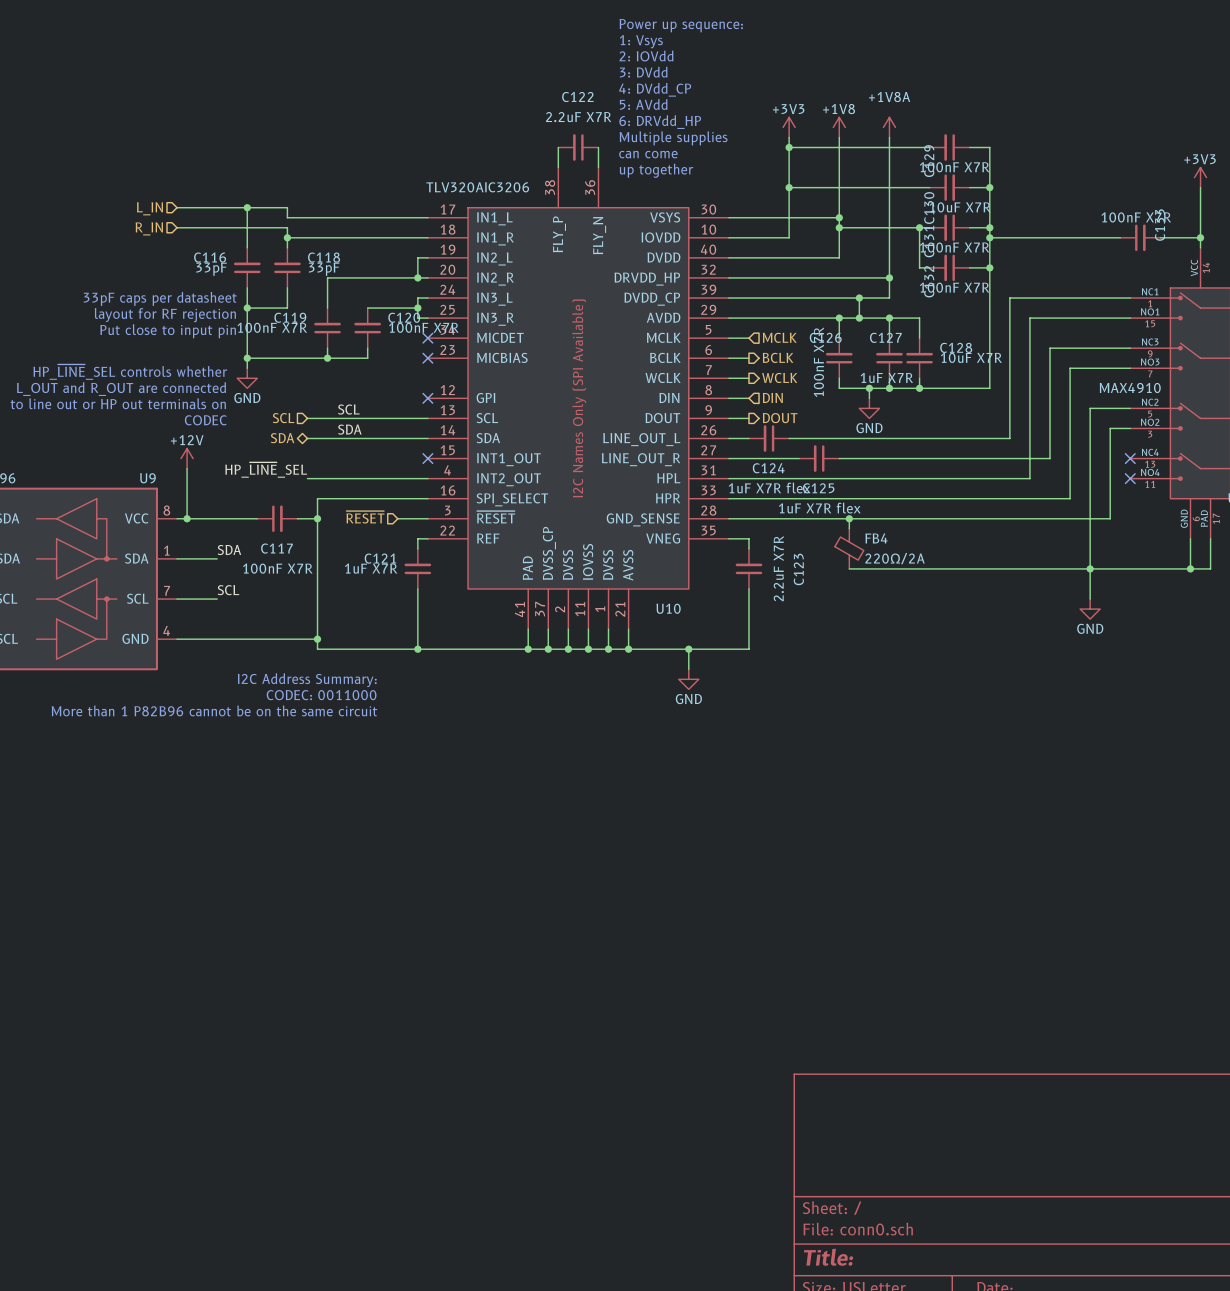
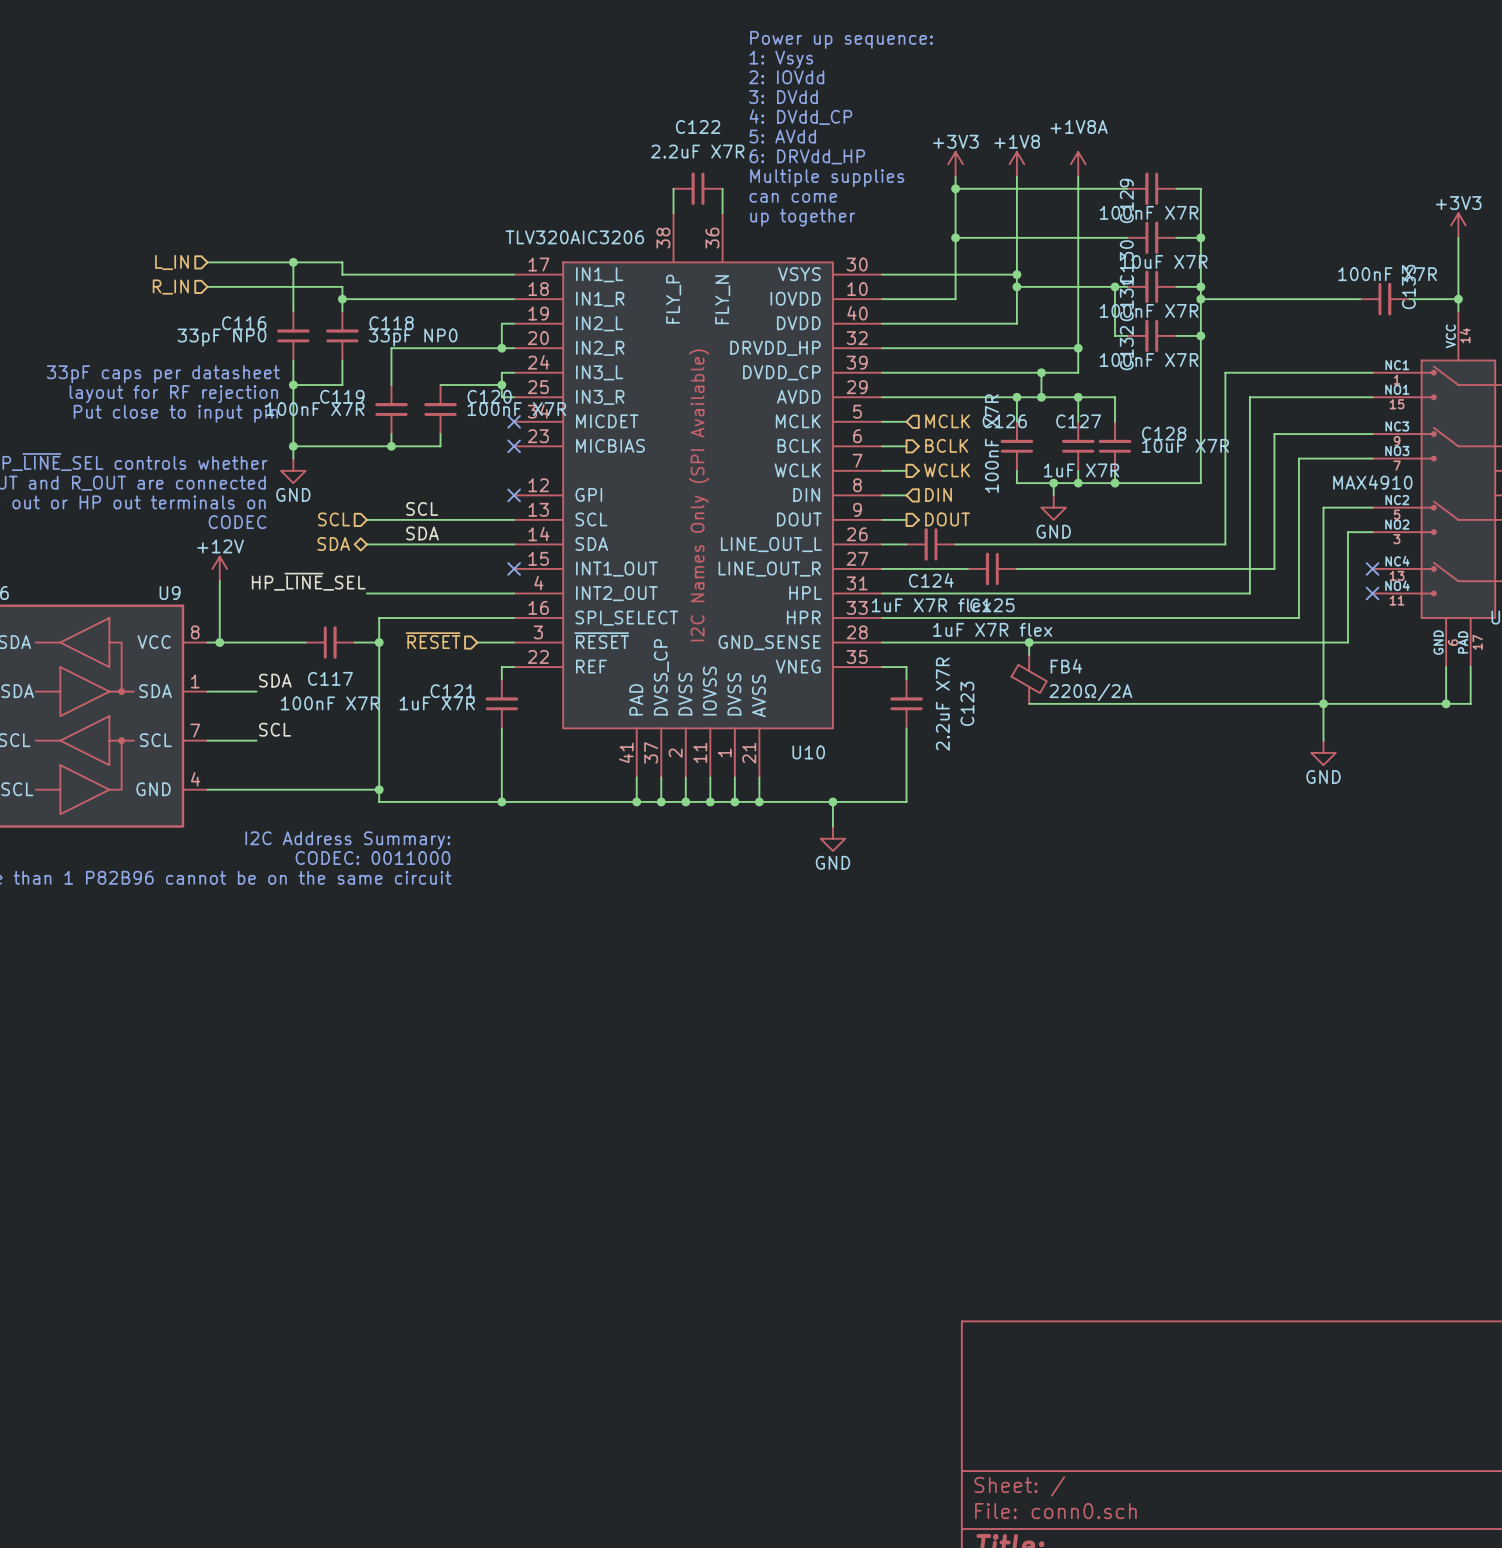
C116 value: 33pF (211, 269) -> 33pF NP0 (222, 337)
C118 value: 33pF (324, 269) -> 33pF NP0 (413, 337)

